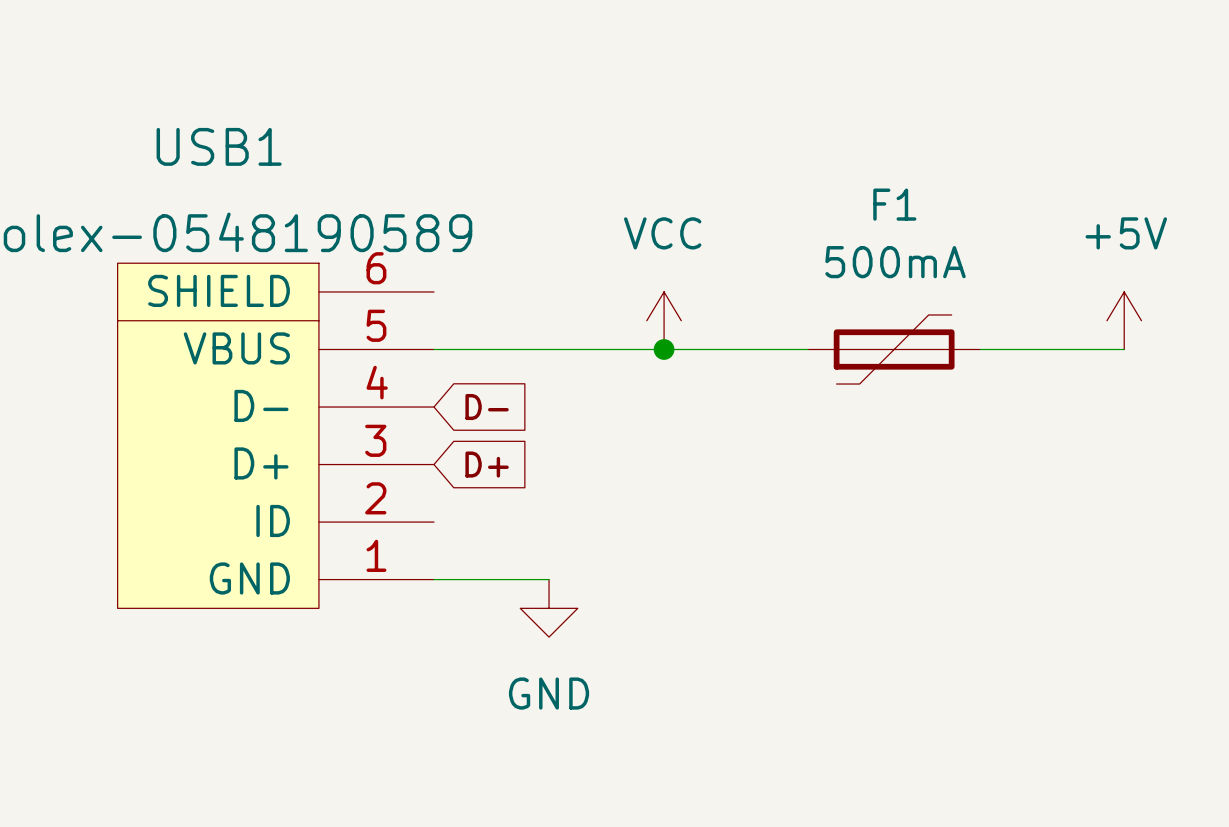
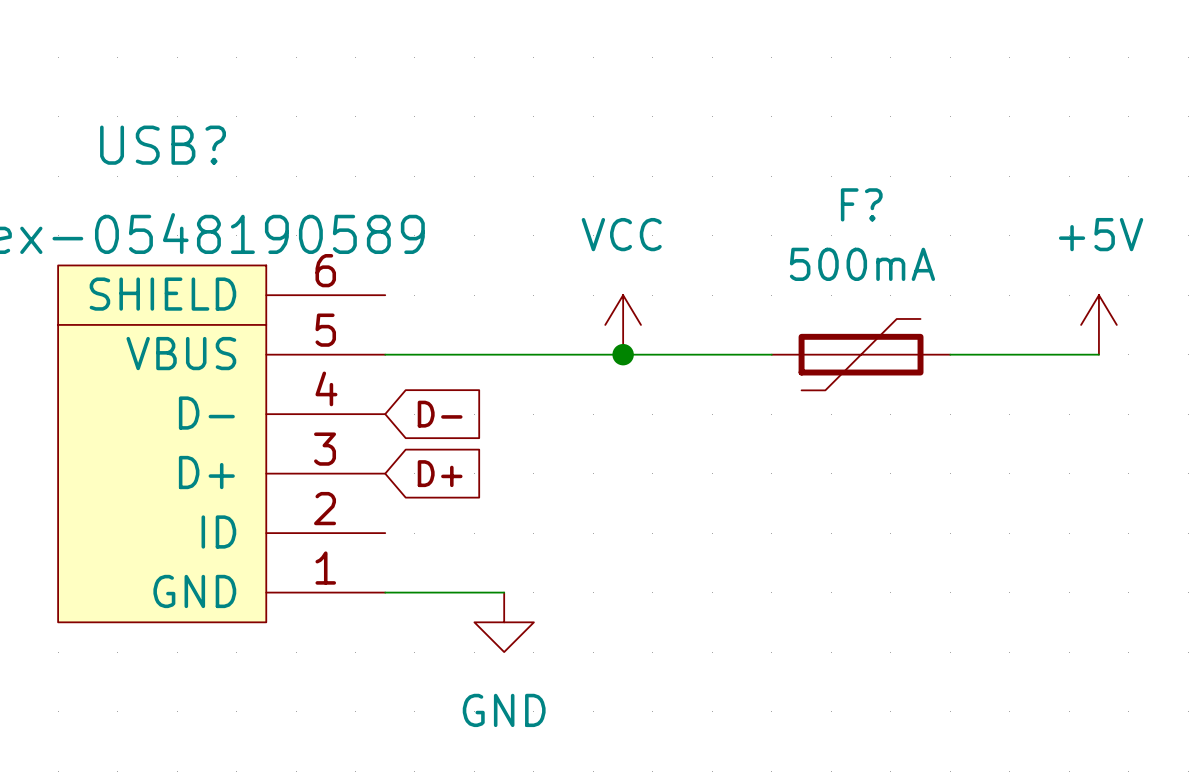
USB1 name: USB1 (219, 146) -> USB? (163, 145)
F1 name: F1 (894, 204) -> F? (861, 204)

